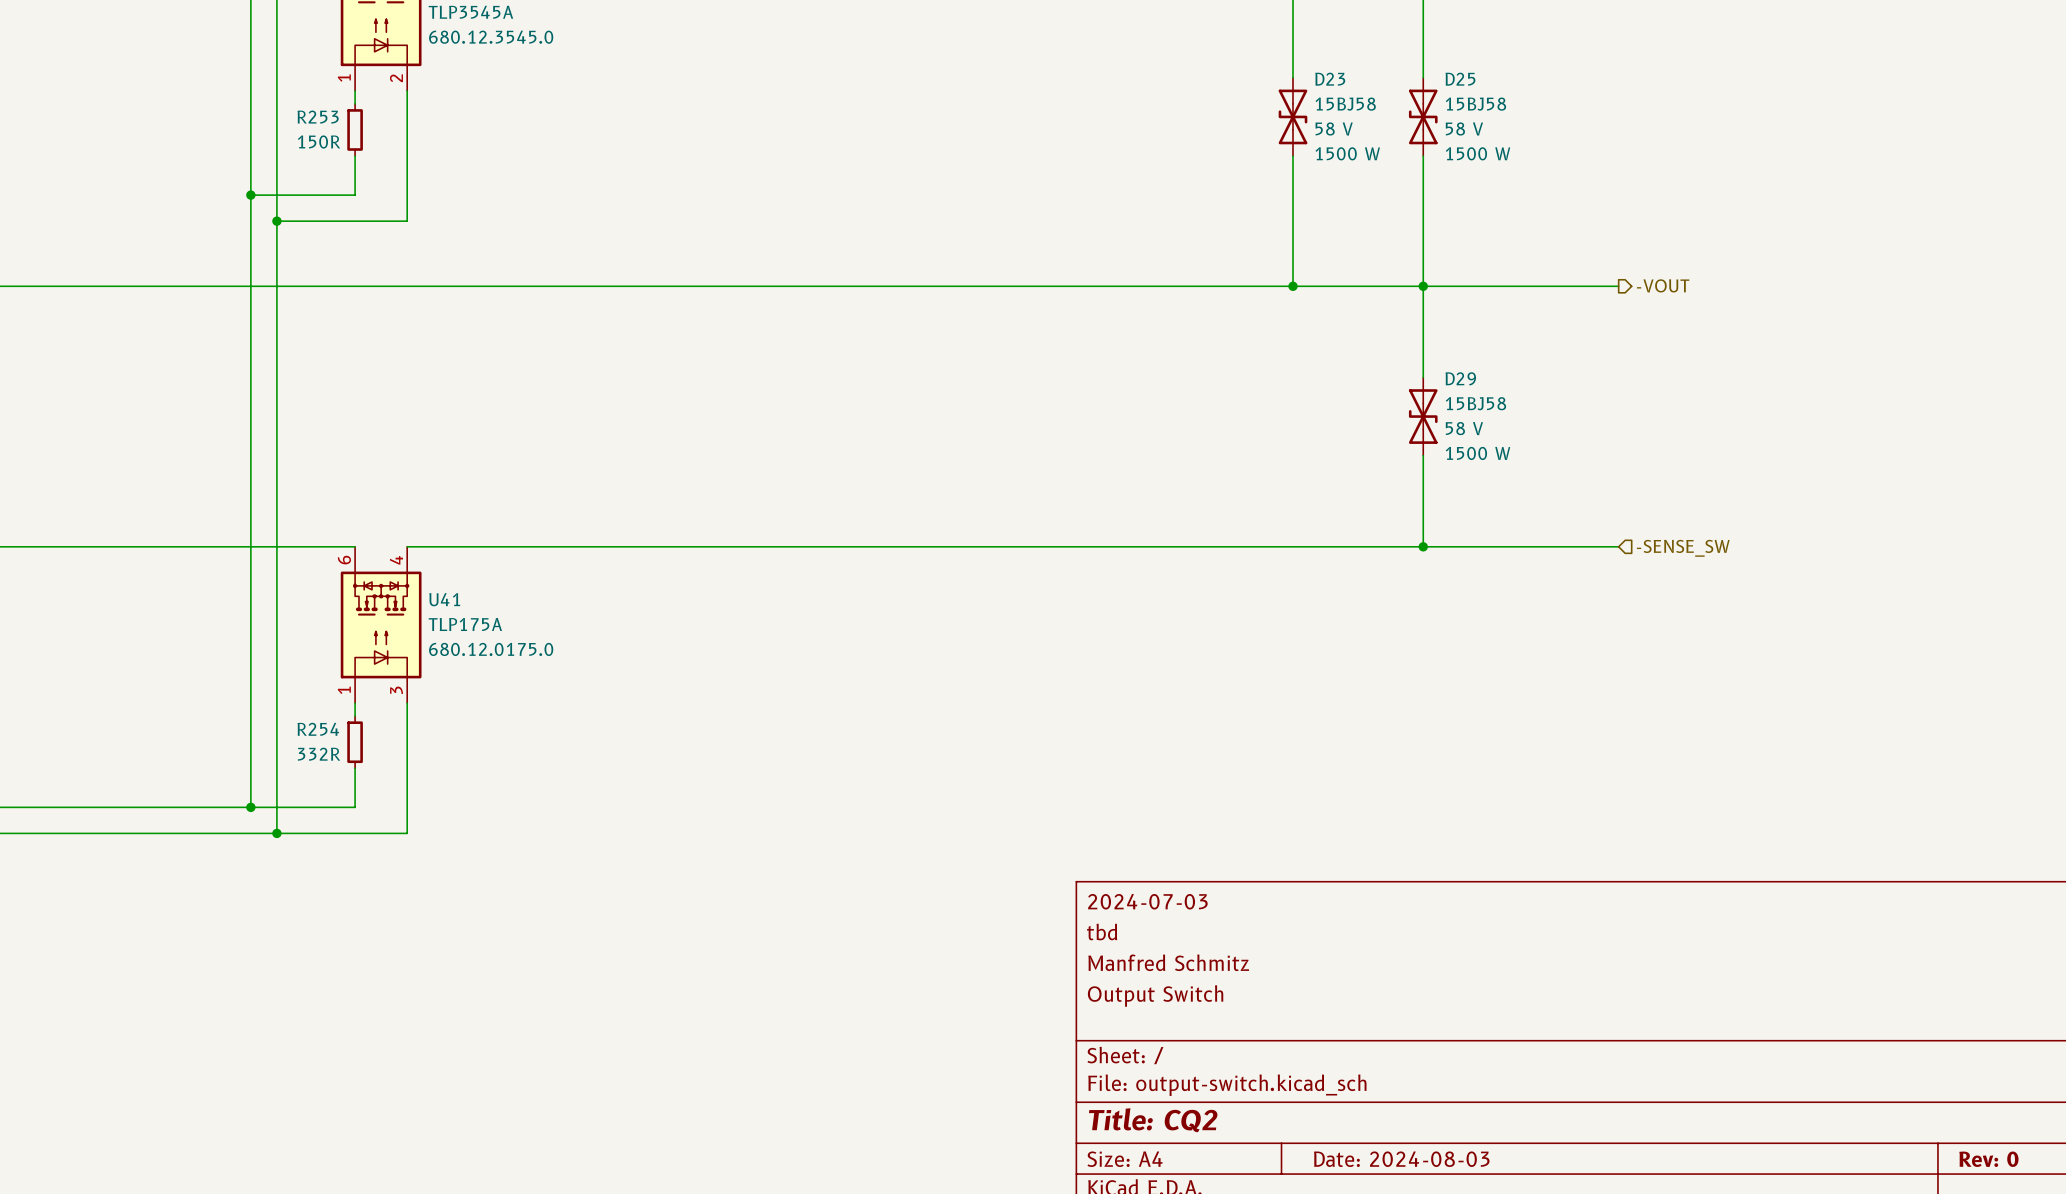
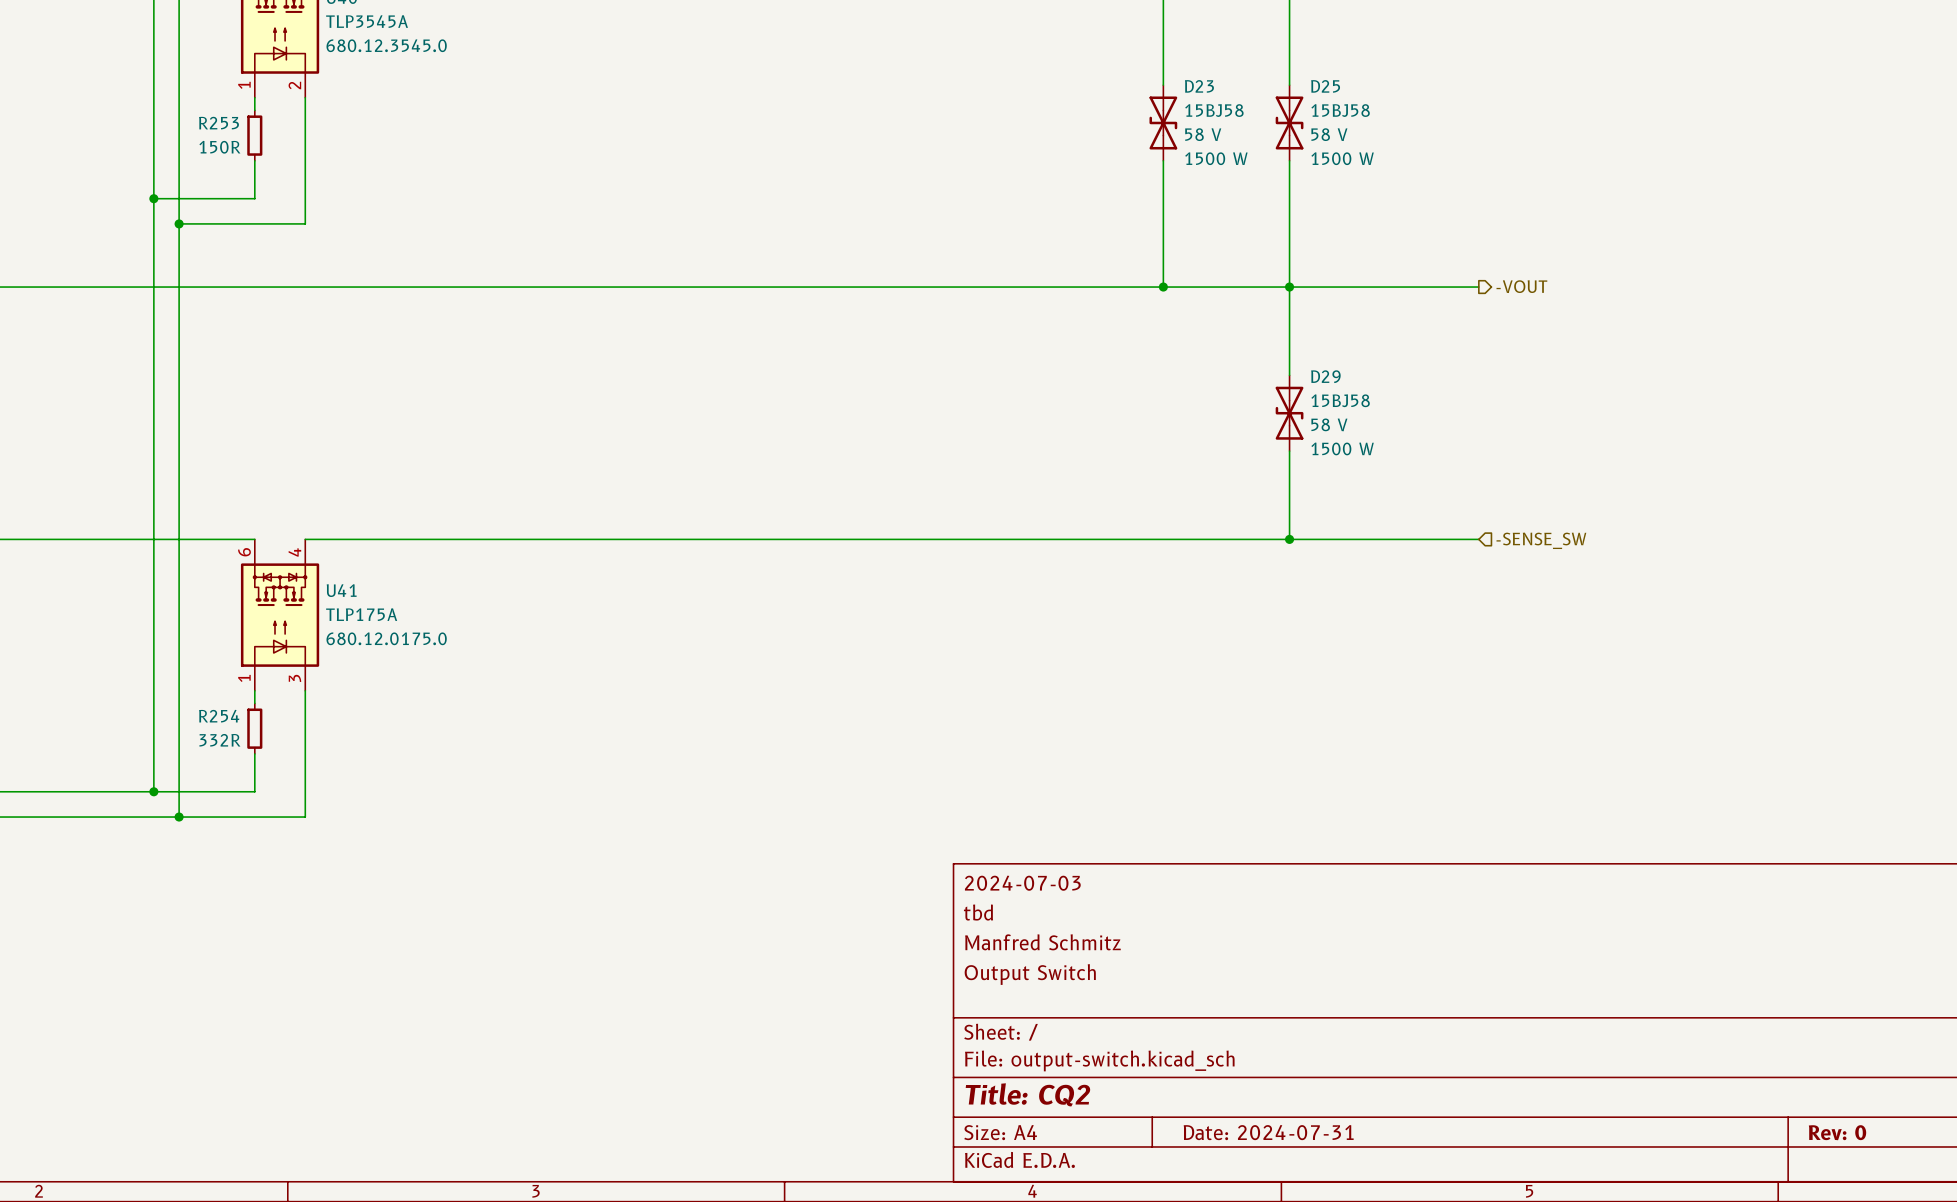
title block: Date: 2024-08-03 (1401, 1159) -> Date: 2024-07-31 (1268, 1132)

